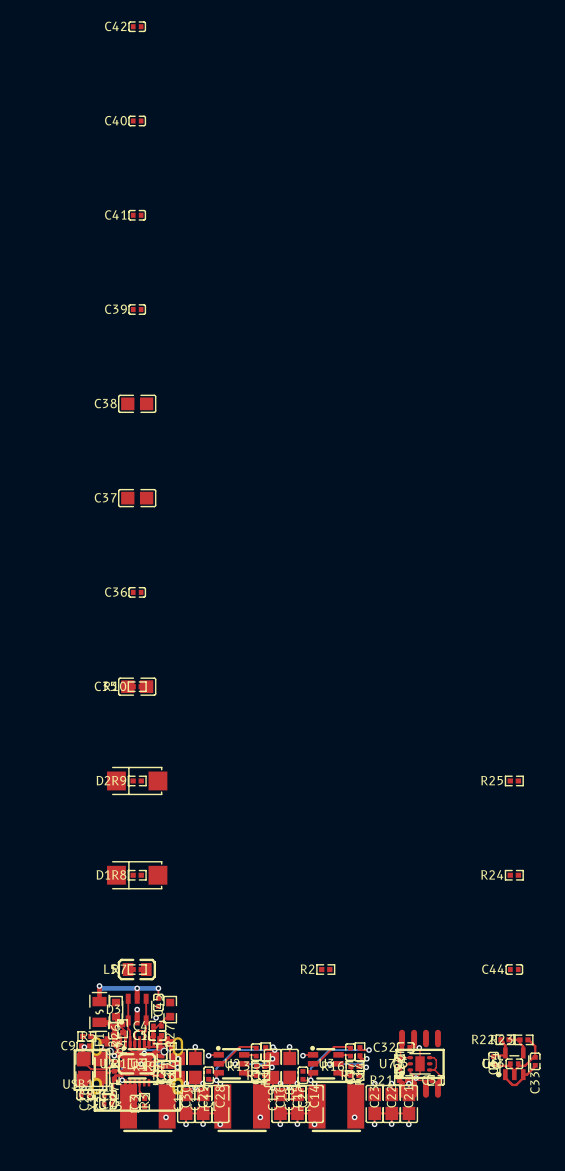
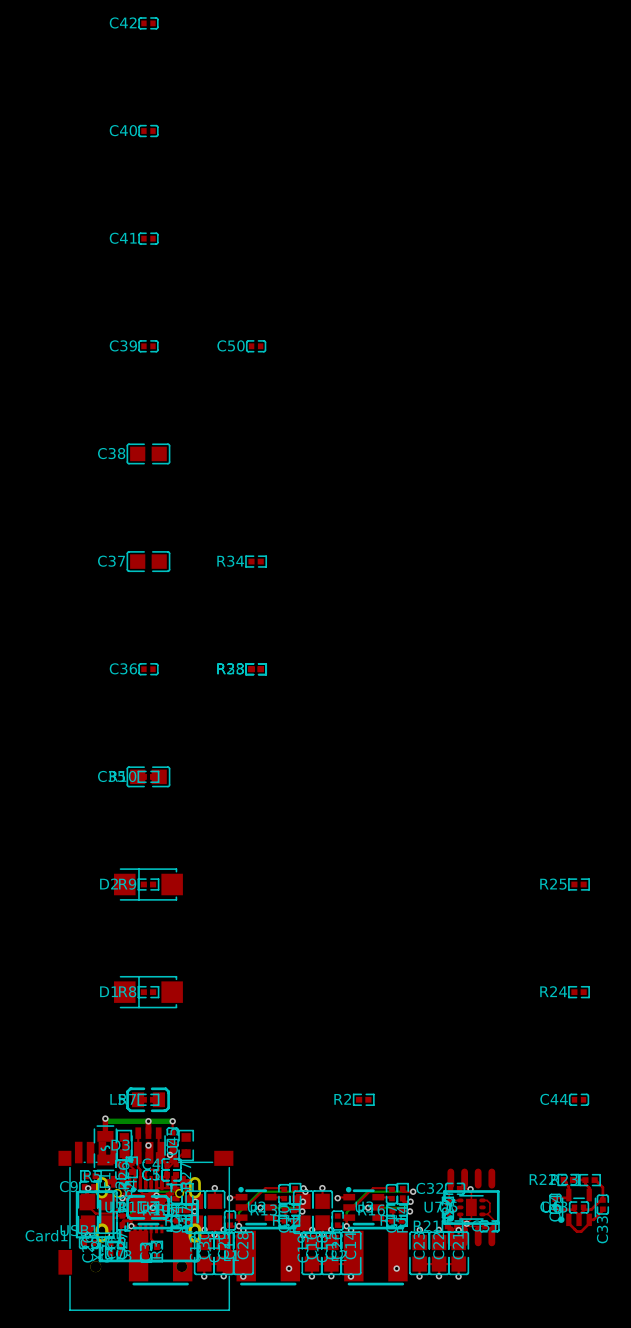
C50: none -> (256, 346)
R34: none -> (256, 561)
part: none -> (256, 669)
part: none -> (256, 669)
Card1: none -> (148, 1226)

